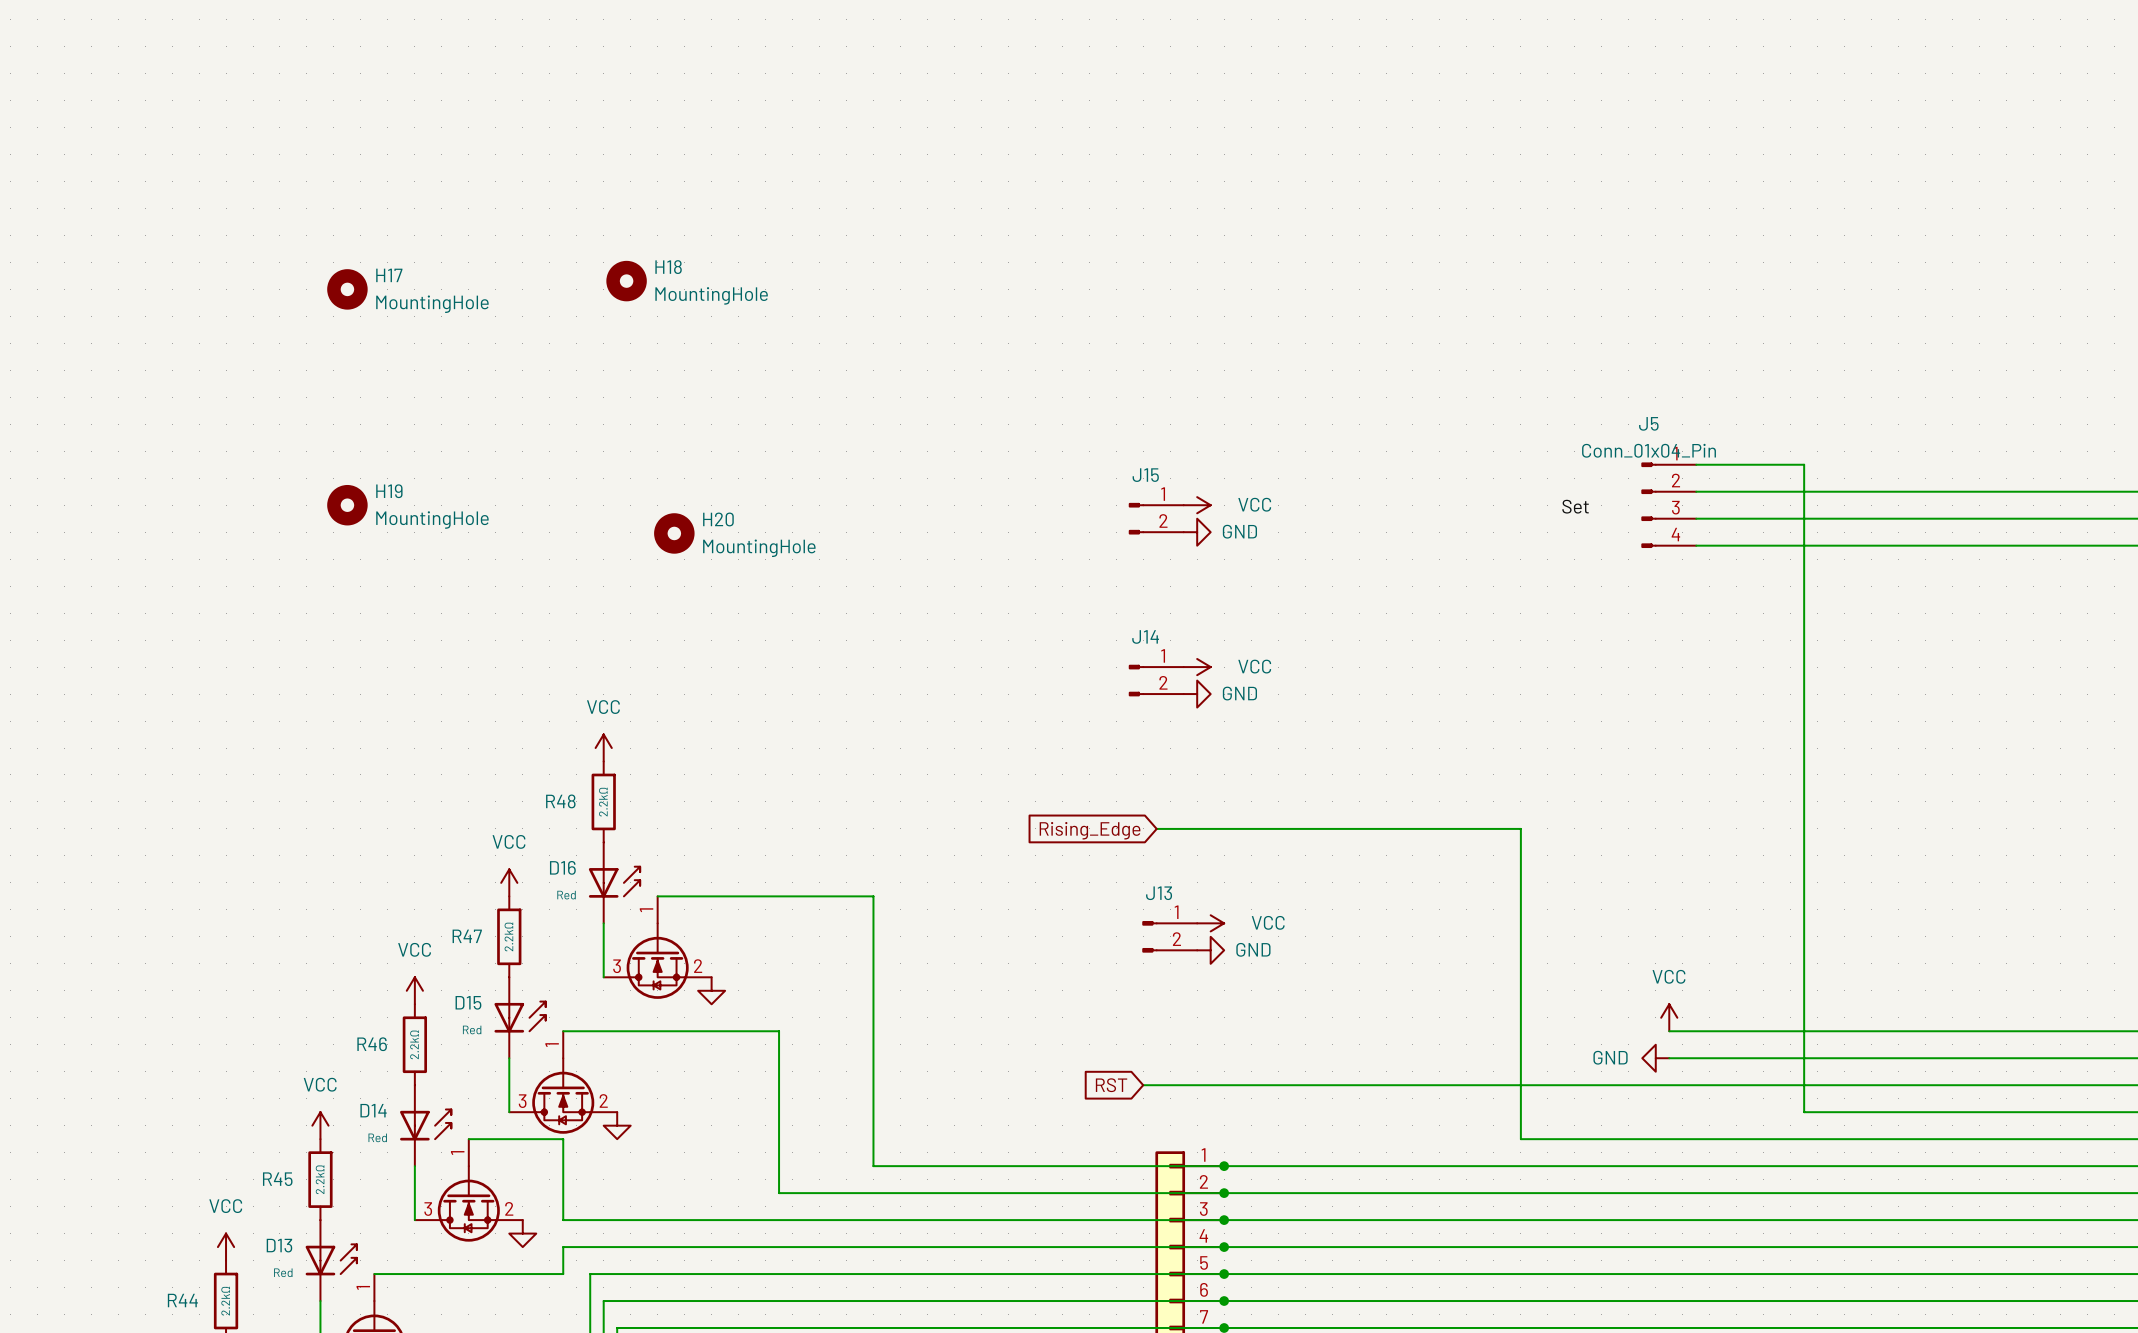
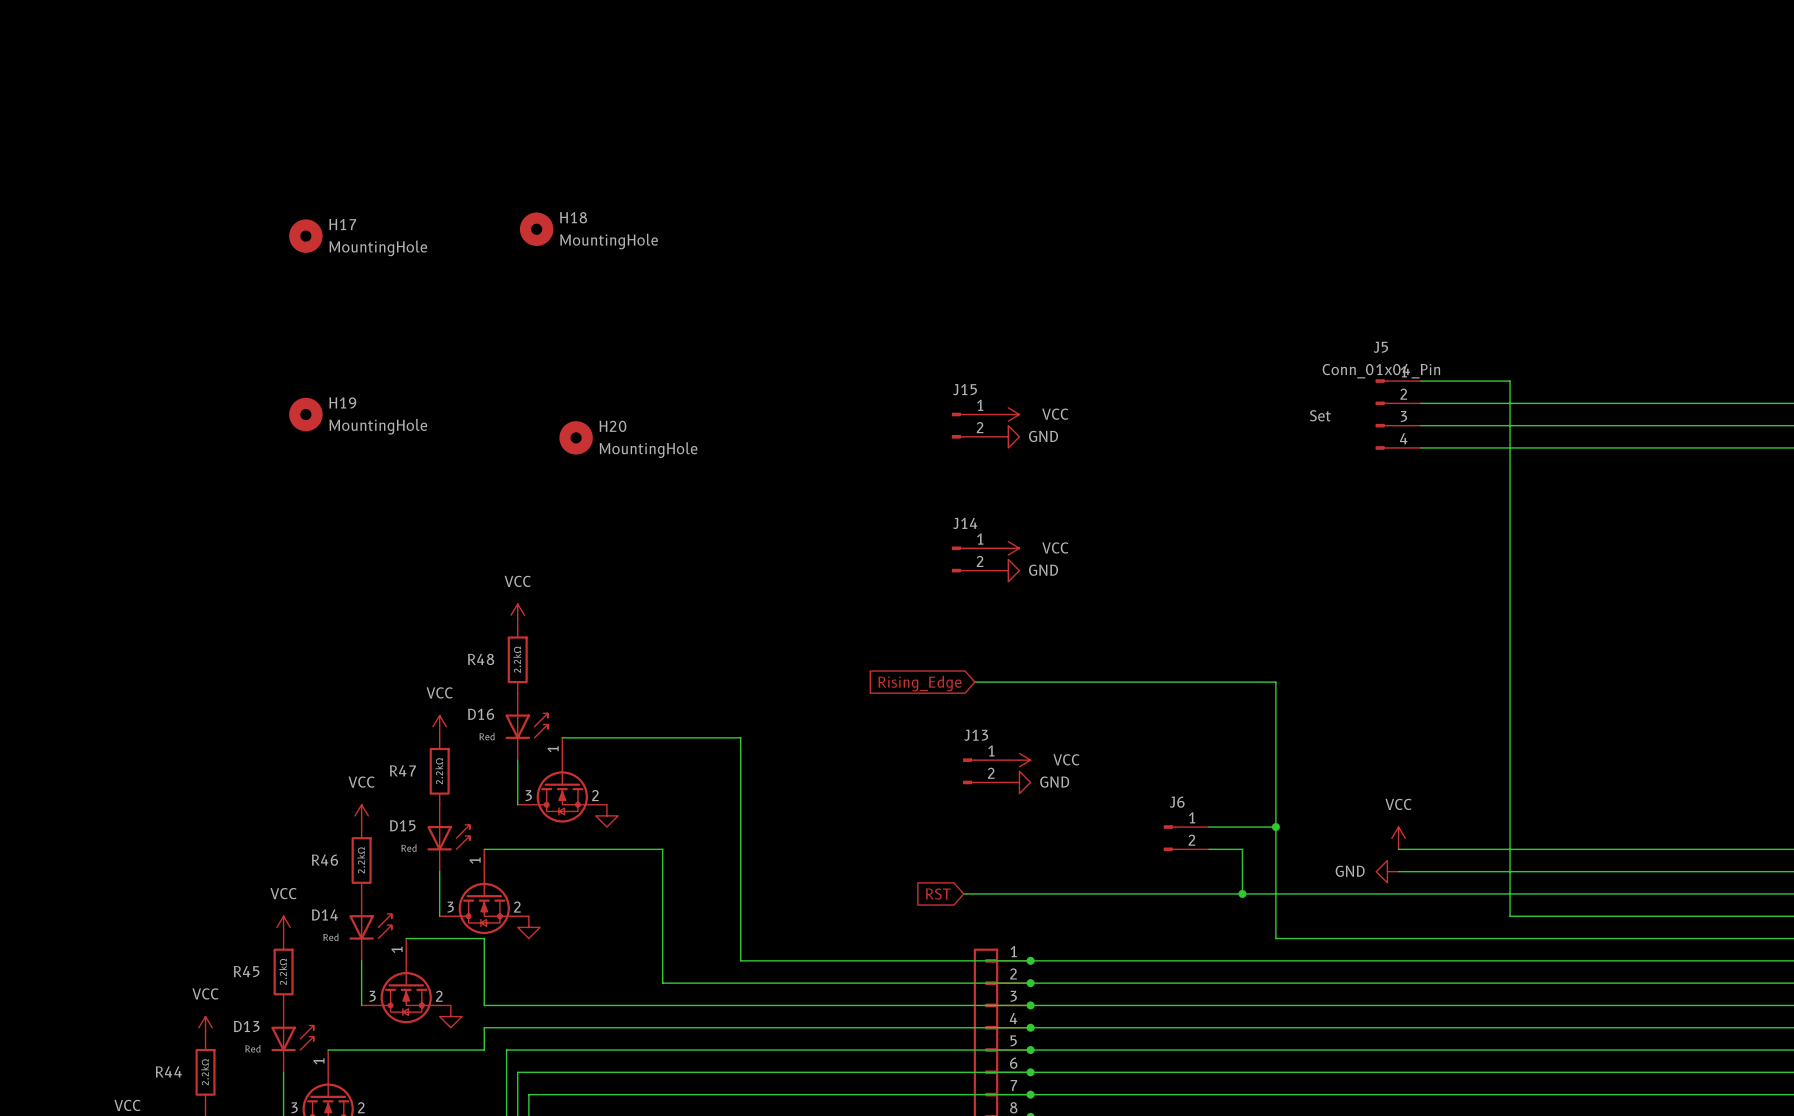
wire: none -> (1208, 827) (1275, 827)
junction: none -> (1275, 827)
J6: none -> (1186, 838)
wire: none -> (1208, 849) (1242, 849) (1242, 893)
junction: none -> (1242, 893)

